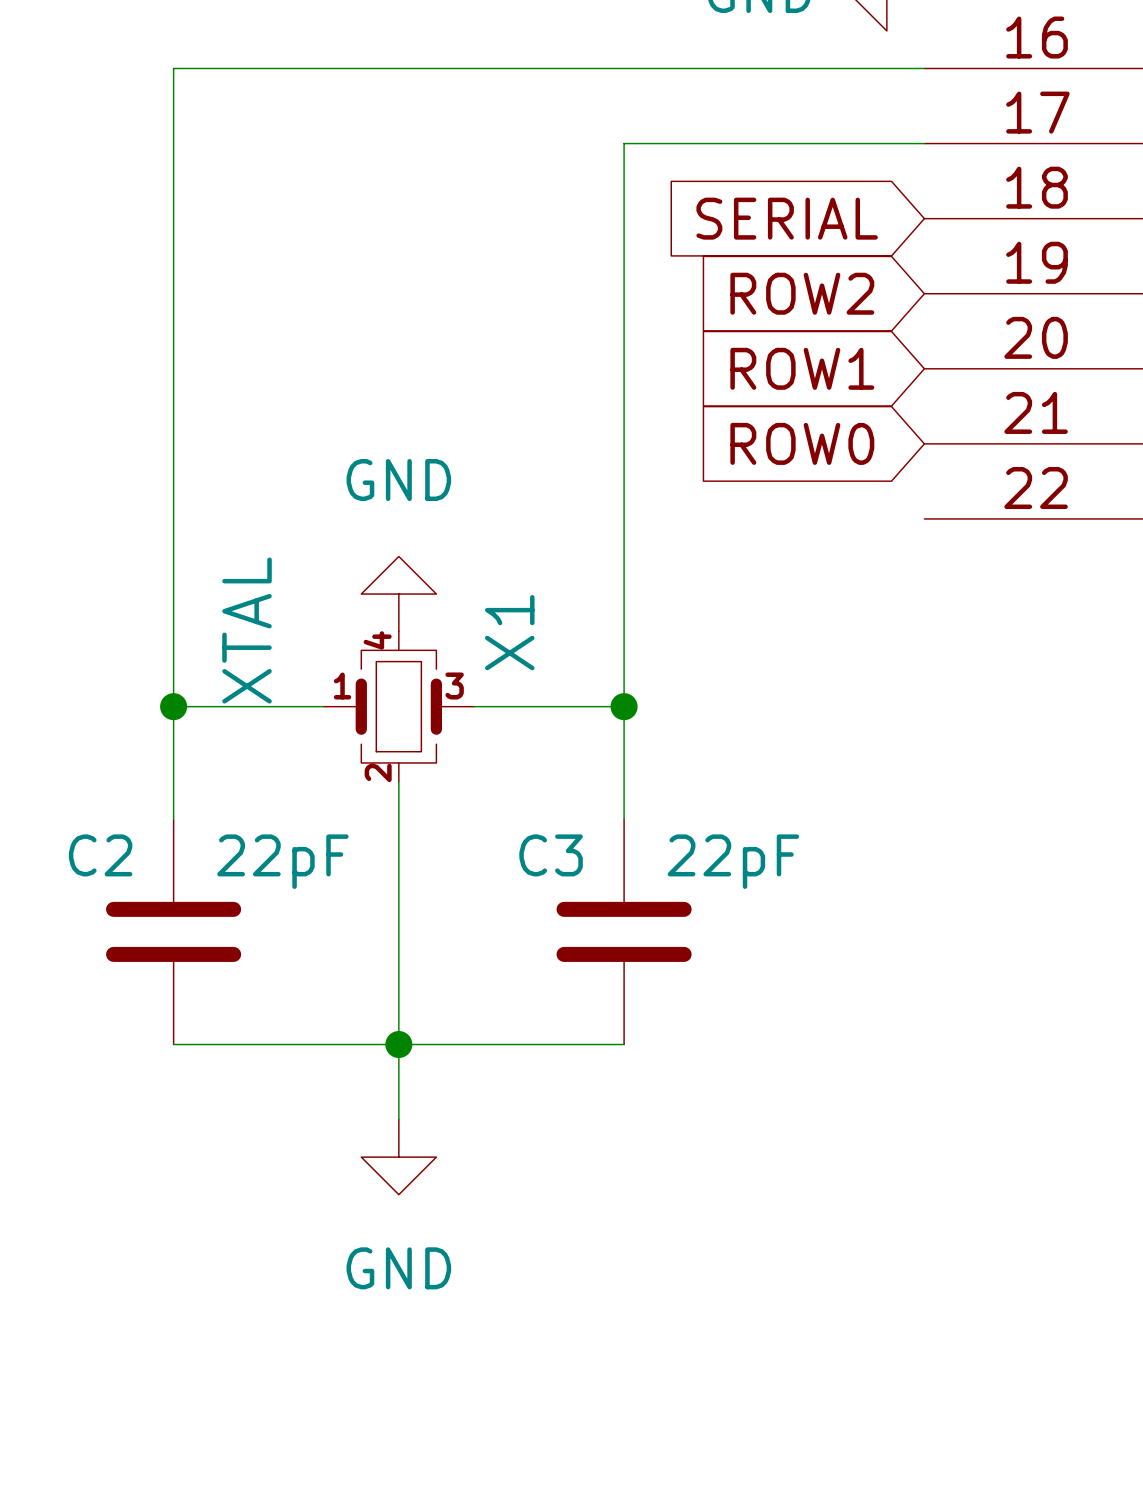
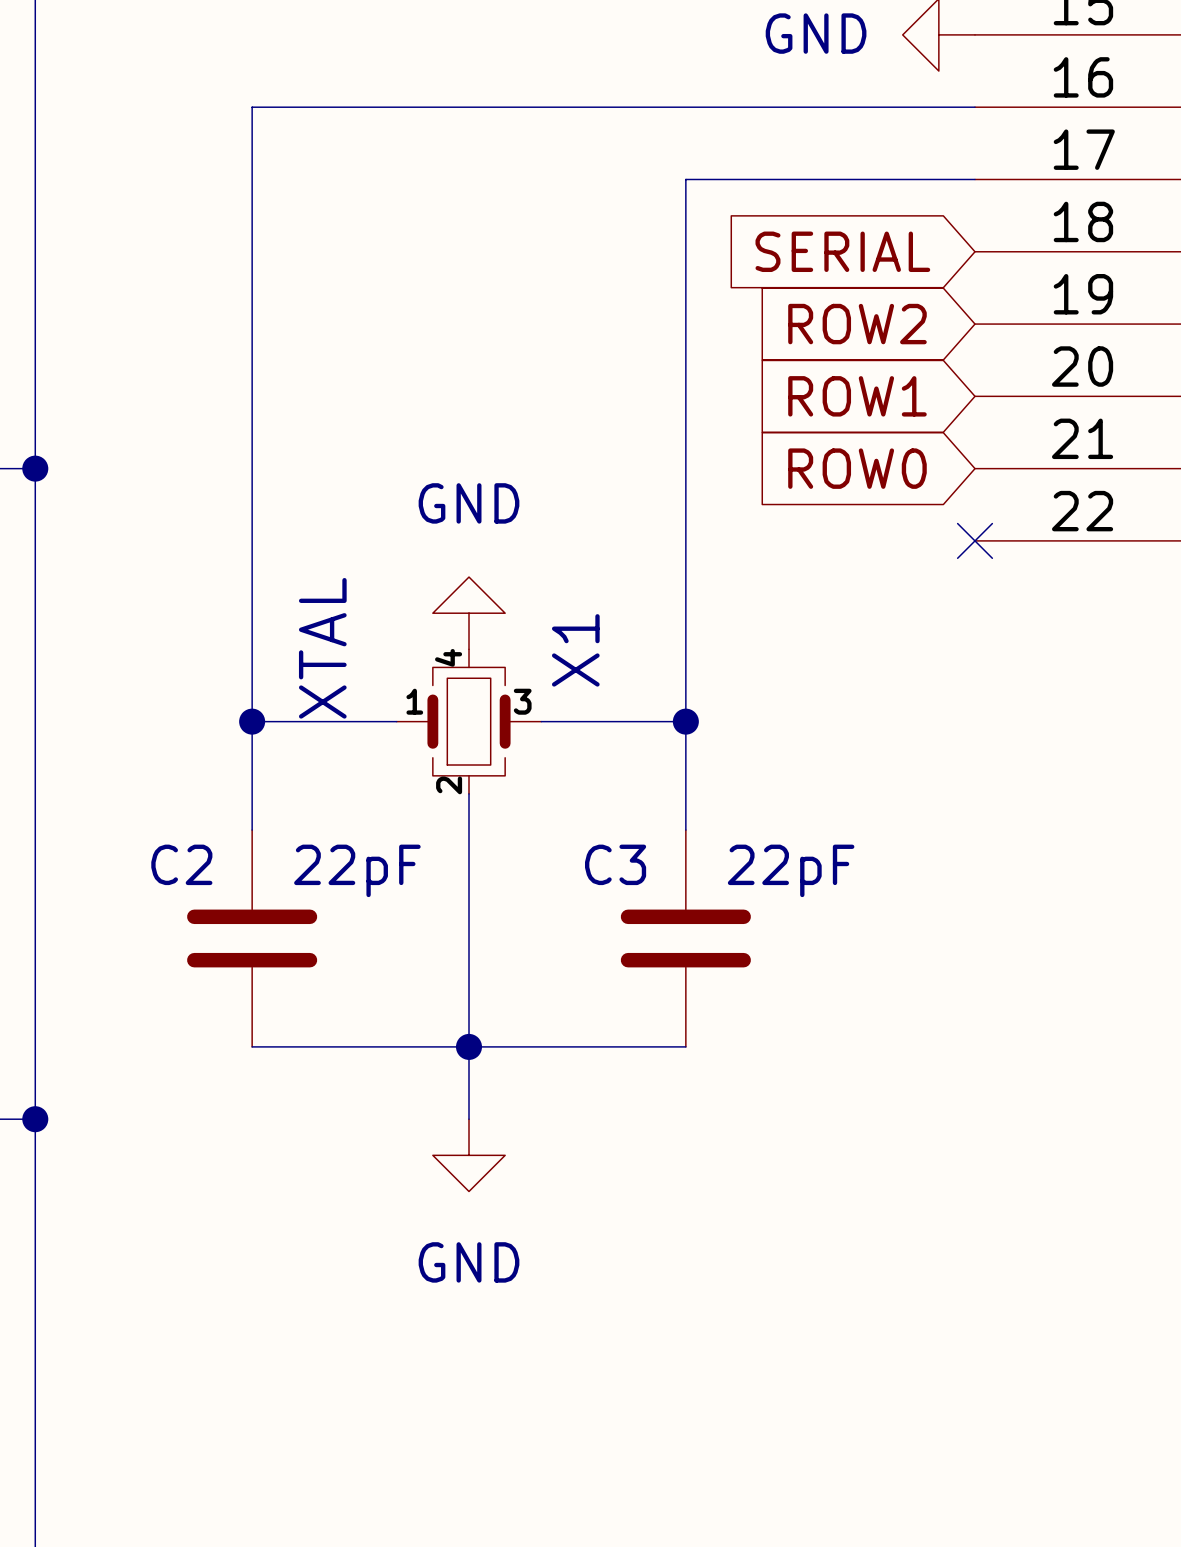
no-connect mark: none -> (975, 540)

